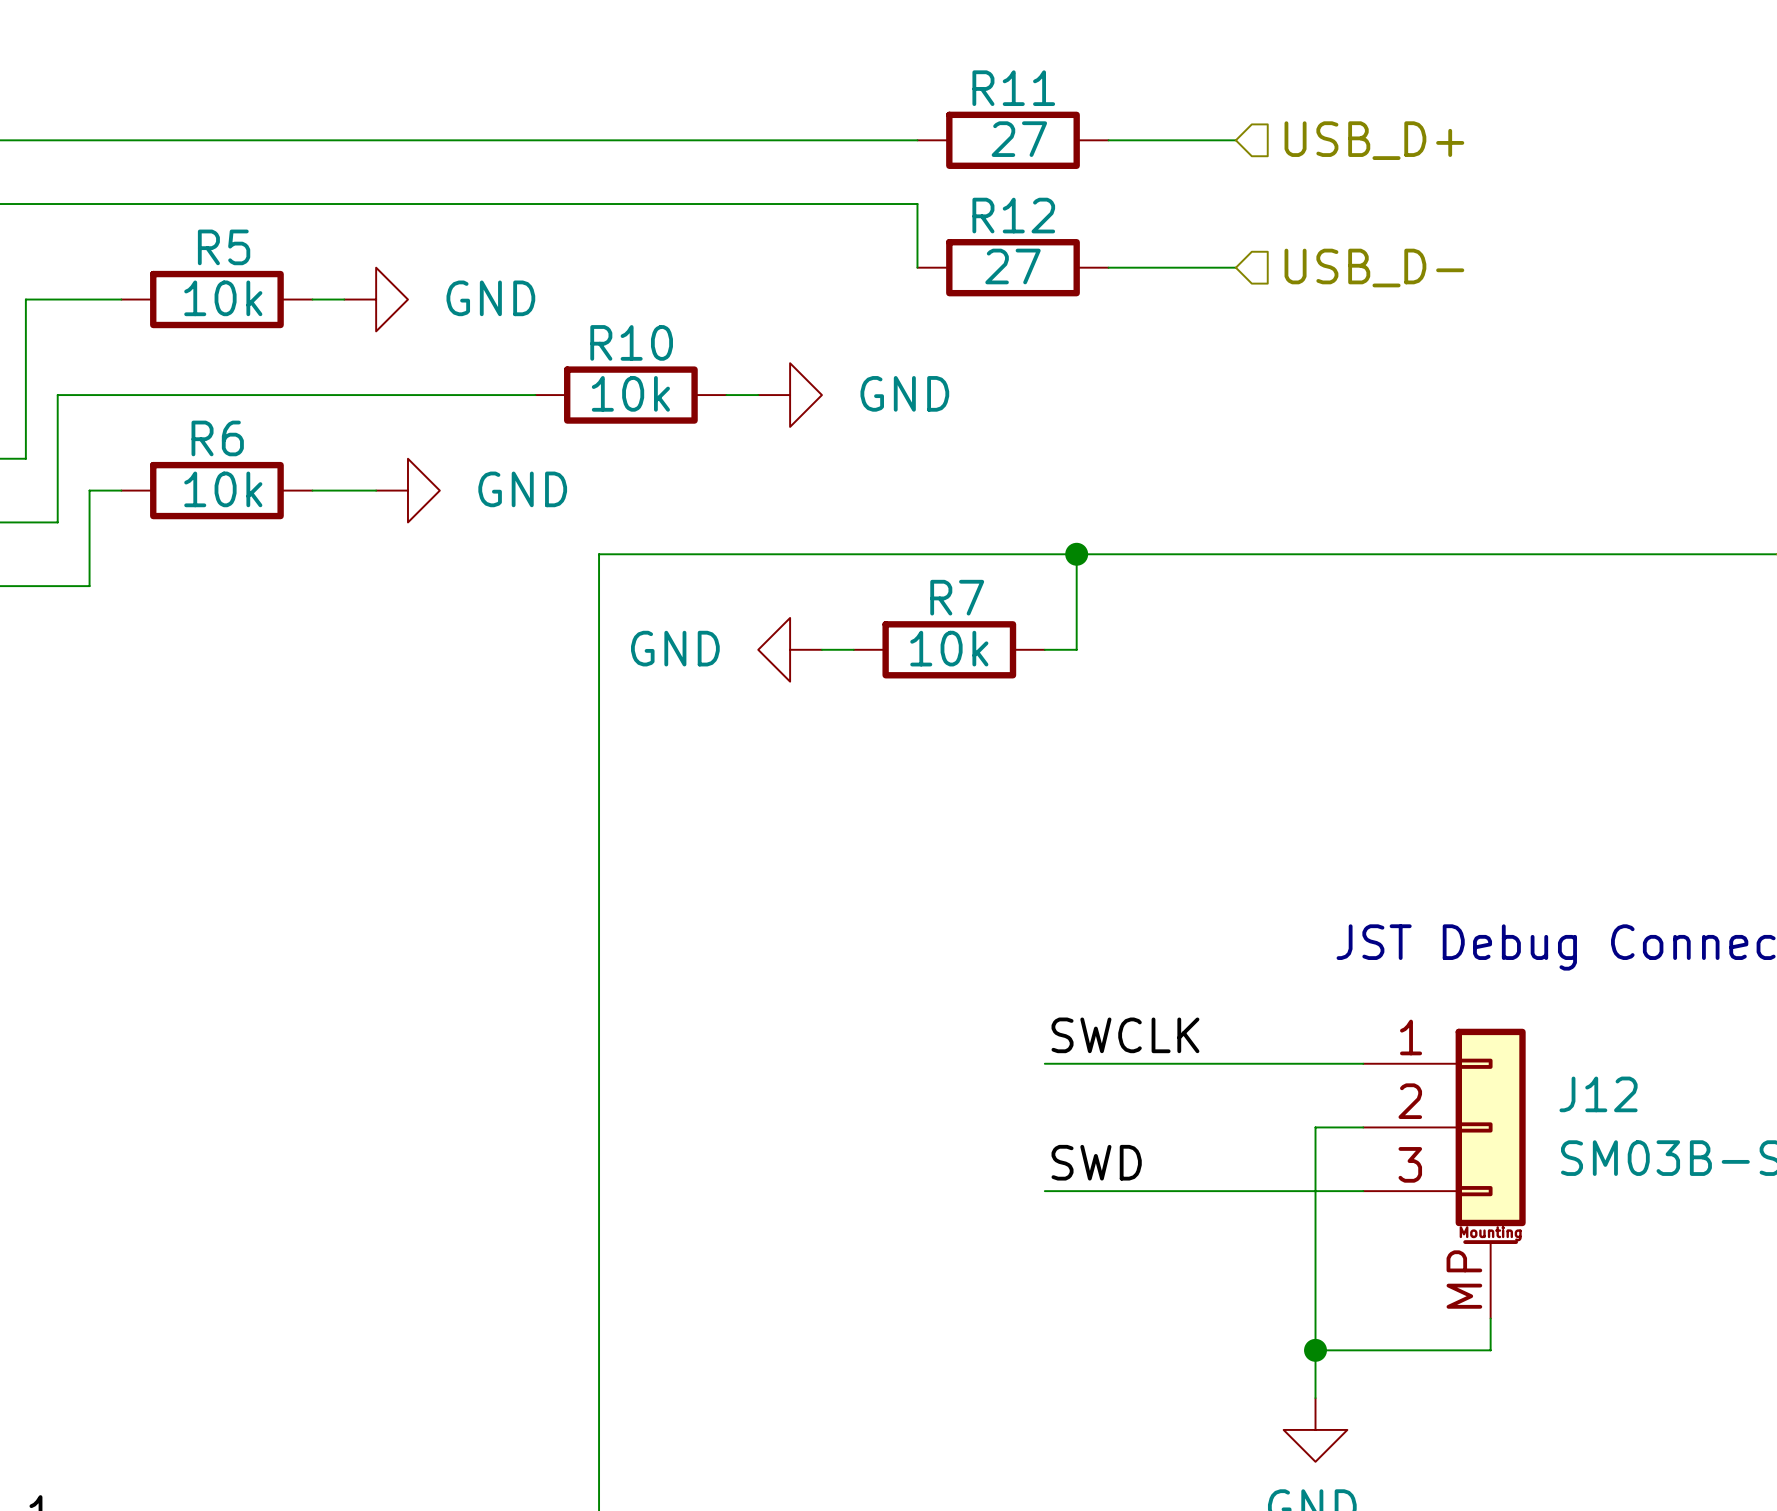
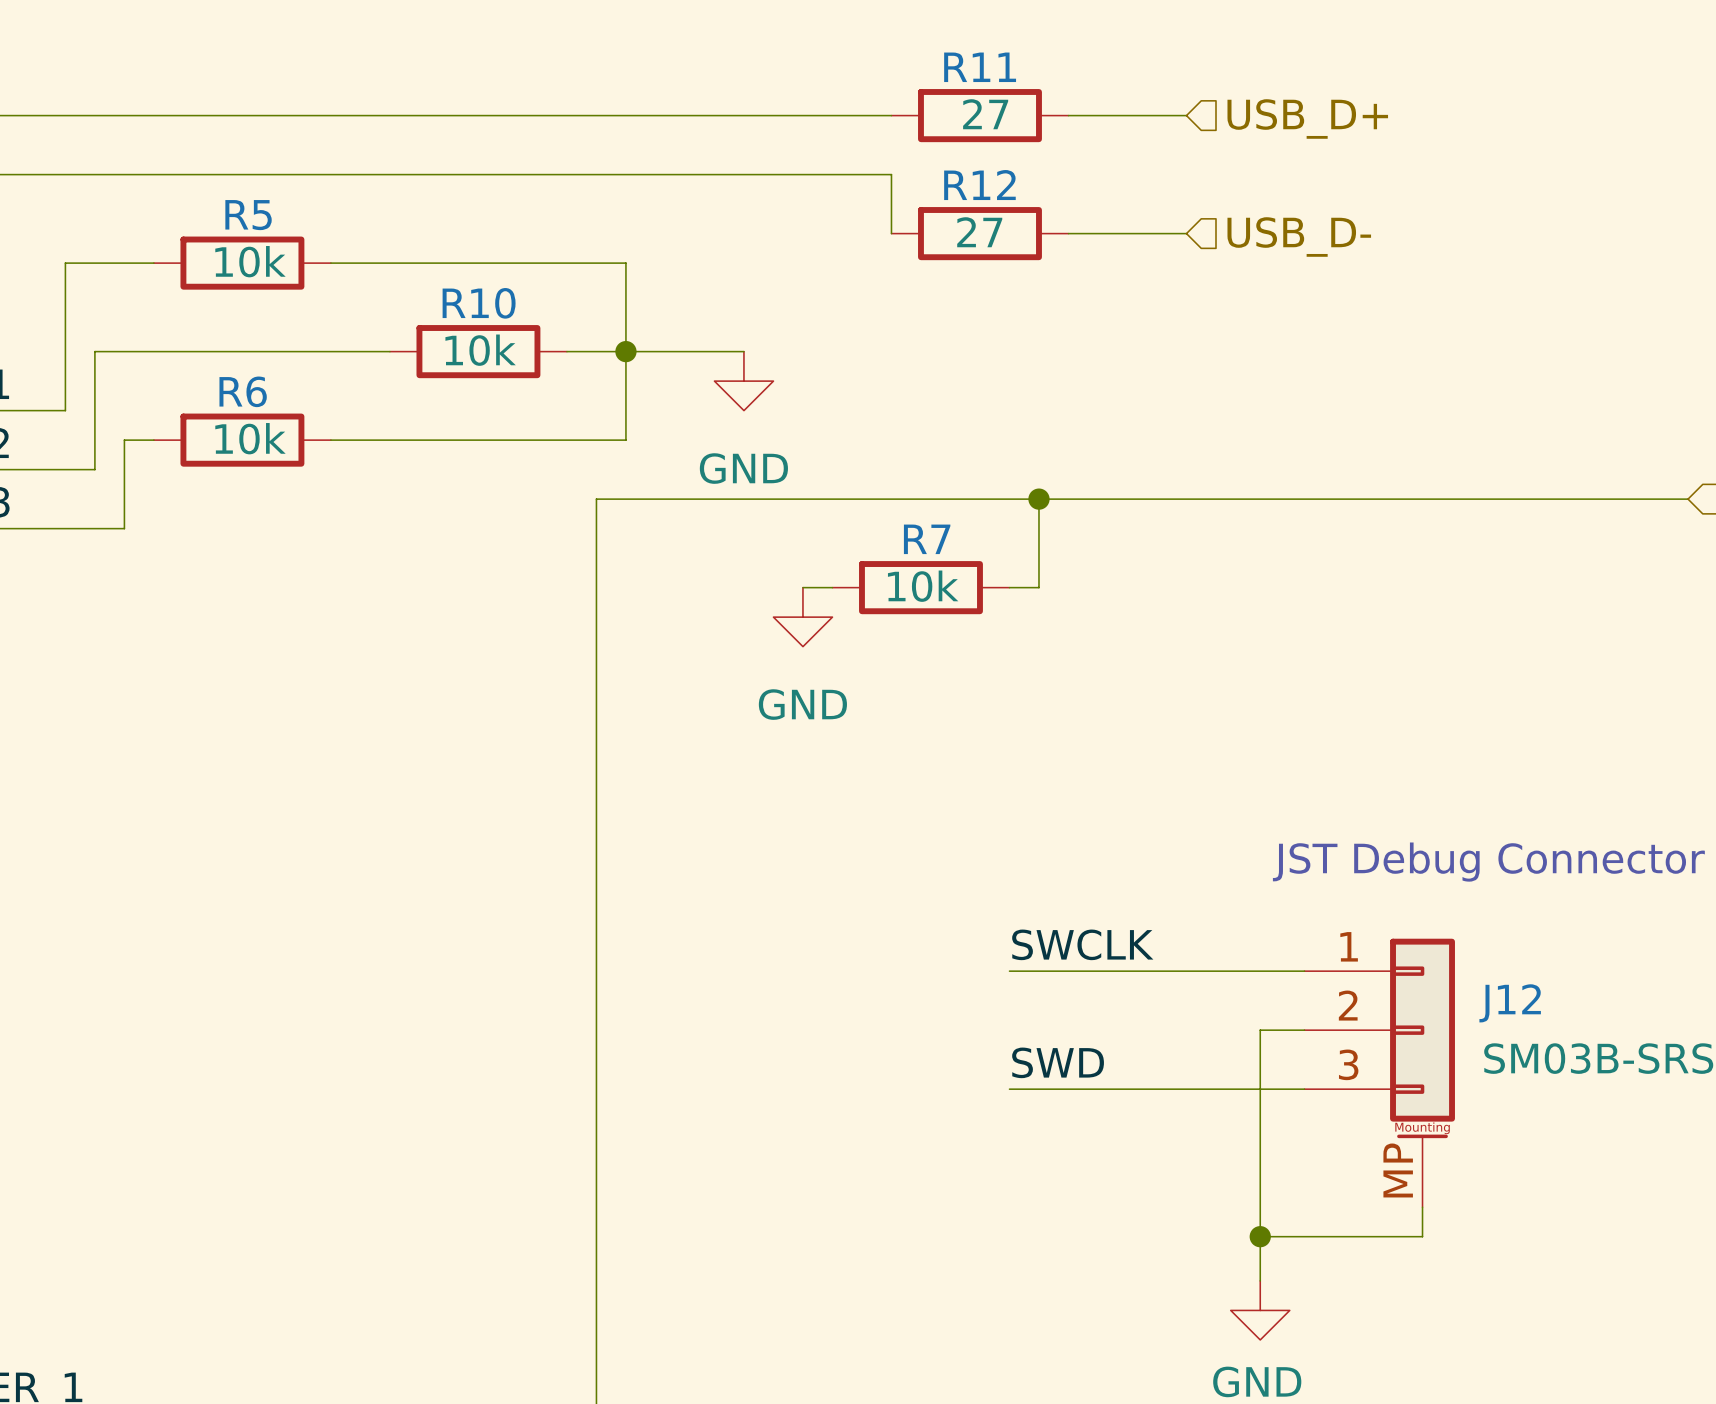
wire: none -> (360, 263) (625, 263) (625, 440) (389, 440)
power symbol: GND (376, 299) -> none
wire: (376, 395) (535, 395) -> (566, 351) (714, 351)
R10 position: (630, 395) -> (478, 351)
junction: none -> (625, 351)
power symbol rotation: 0° (790, 395) -> 90° clockwise (743, 381)
power symbol position: GND (790, 395) -> GND (743, 381)
power symbol: GND (407, 490) -> none
power symbol rotation: 0° (790, 649) -> 90° counterclockwise (802, 617)
power symbol position: GND (790, 649) -> GND (802, 617)

